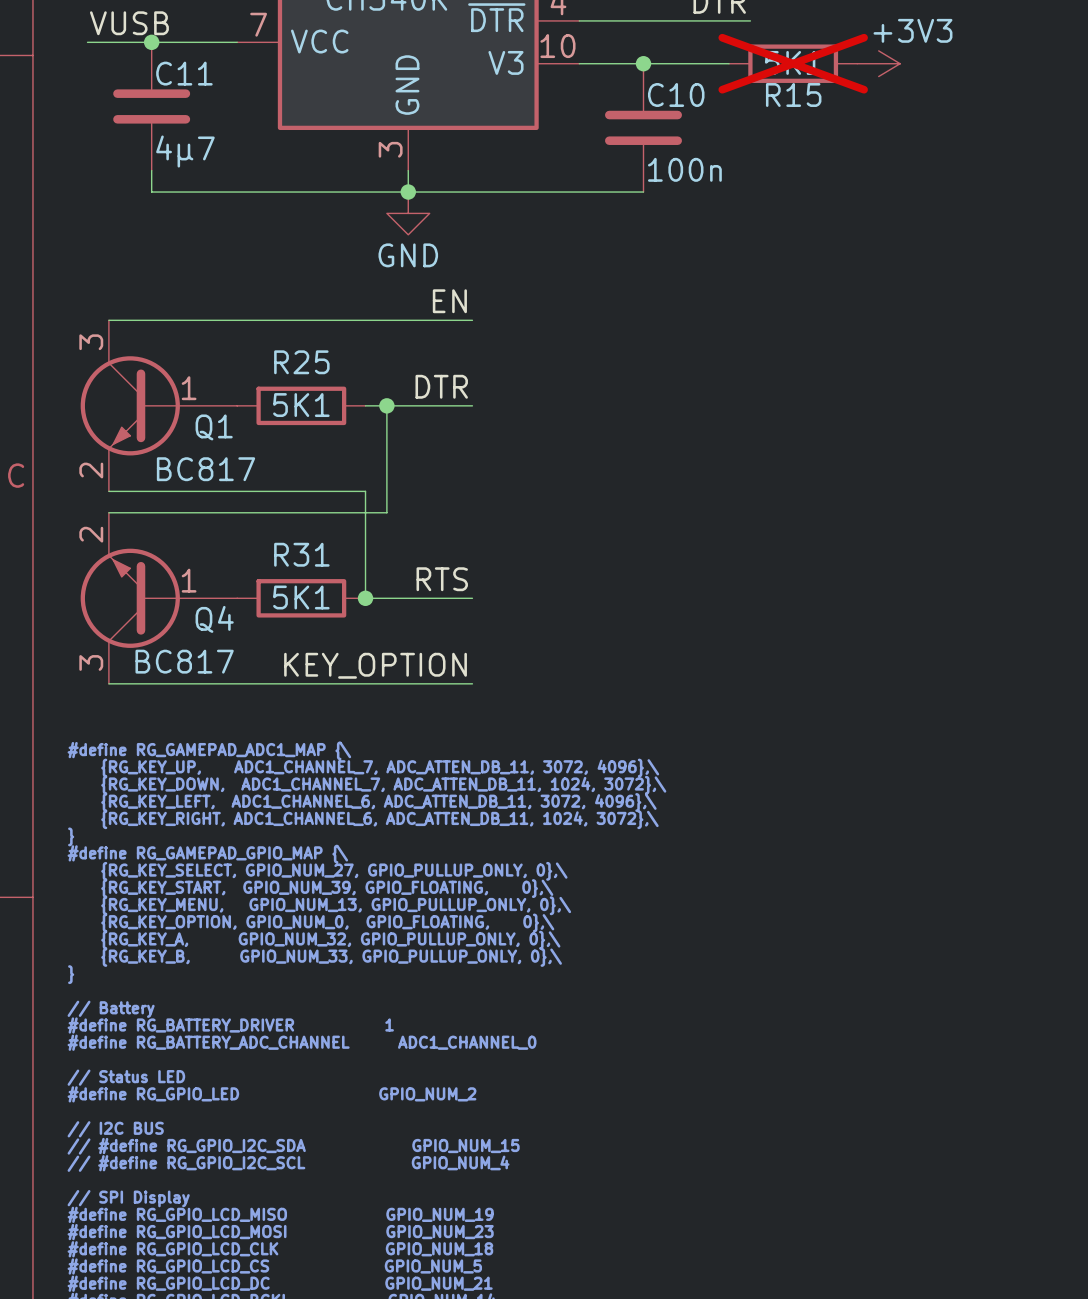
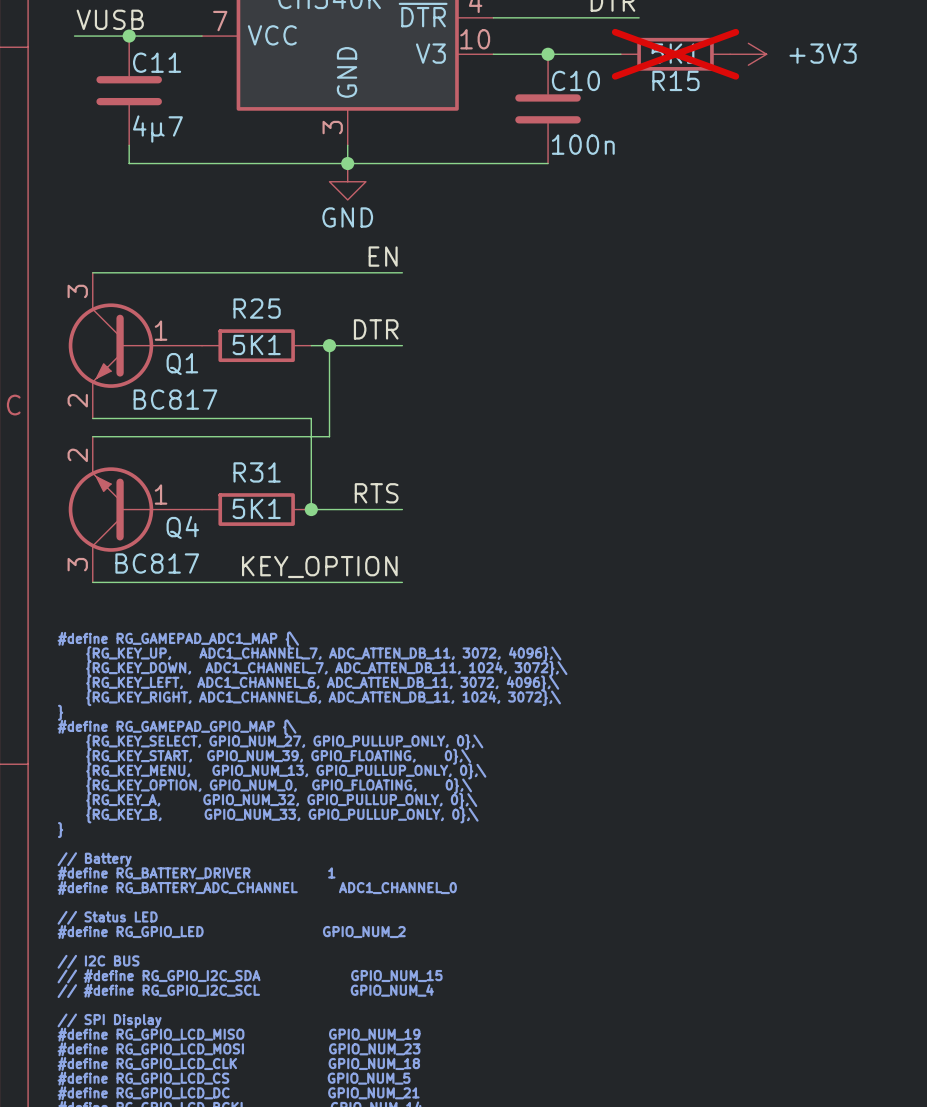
power symbol text position: +3V3 (912, 30) -> +3V3 (823, 53)

